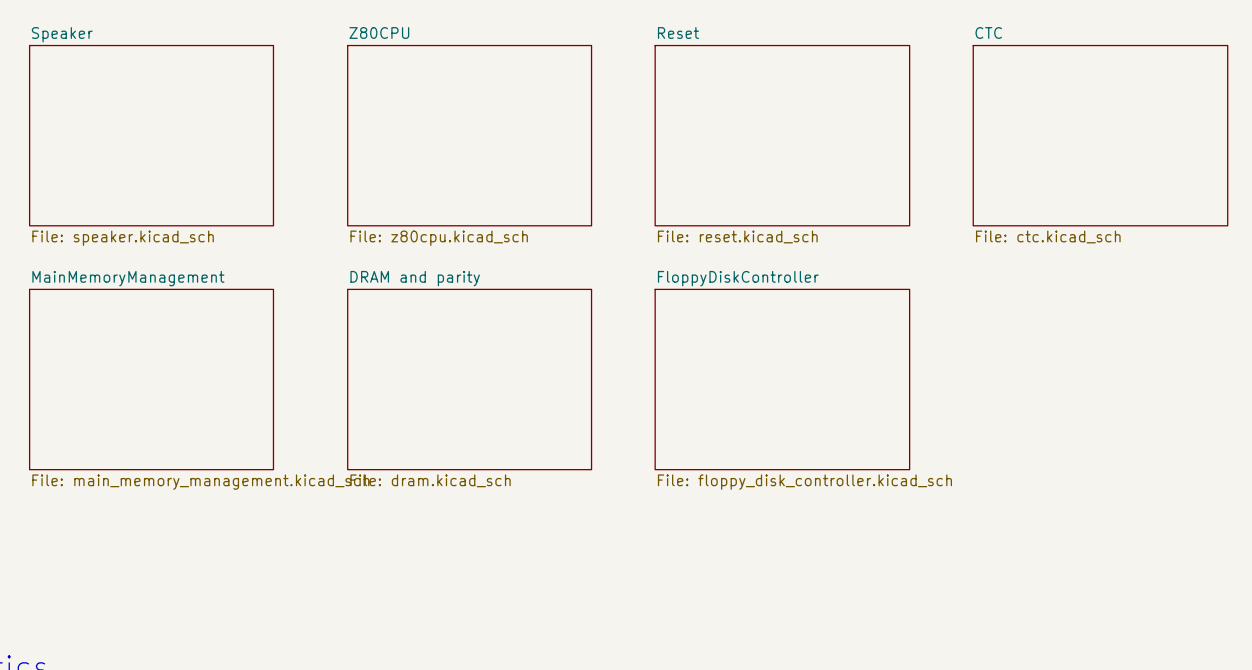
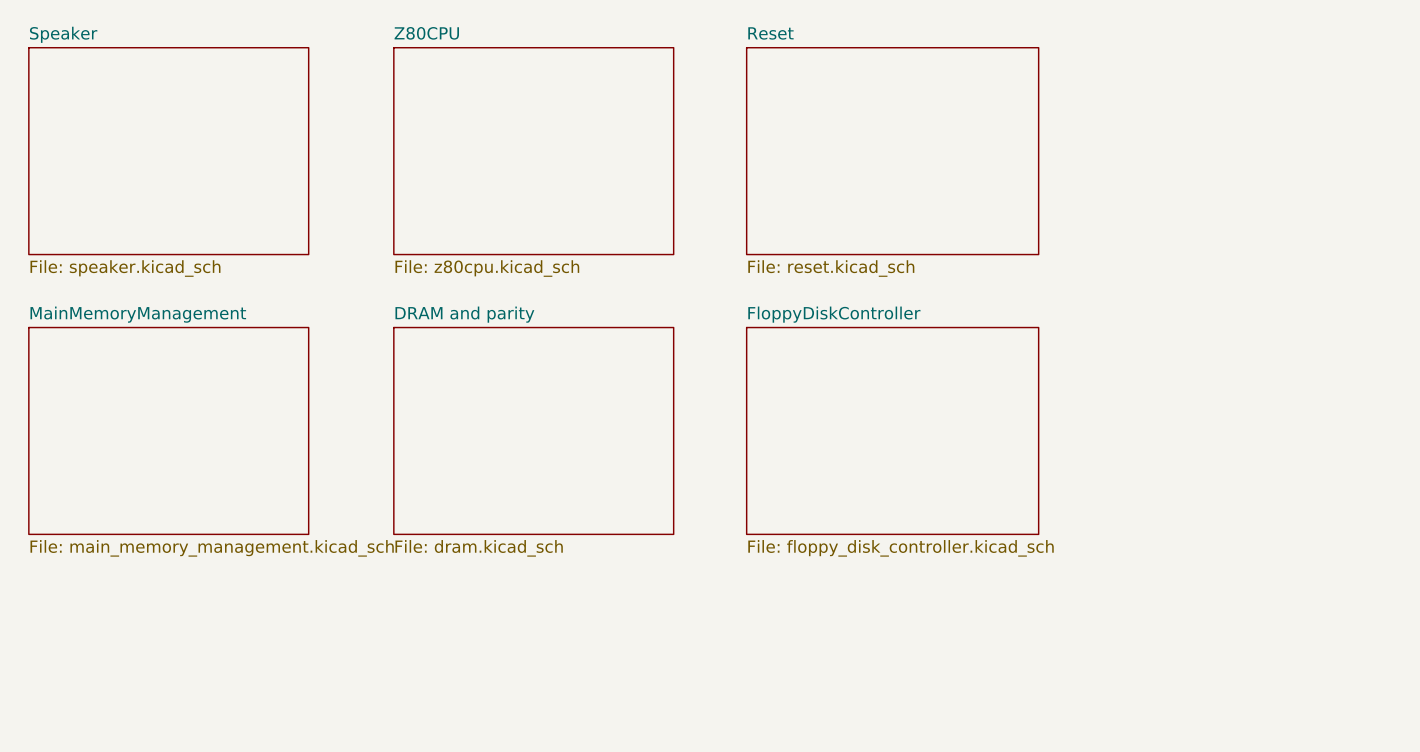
sheet CTC: File: ctc.kicad_sch (1100, 135) -> none

